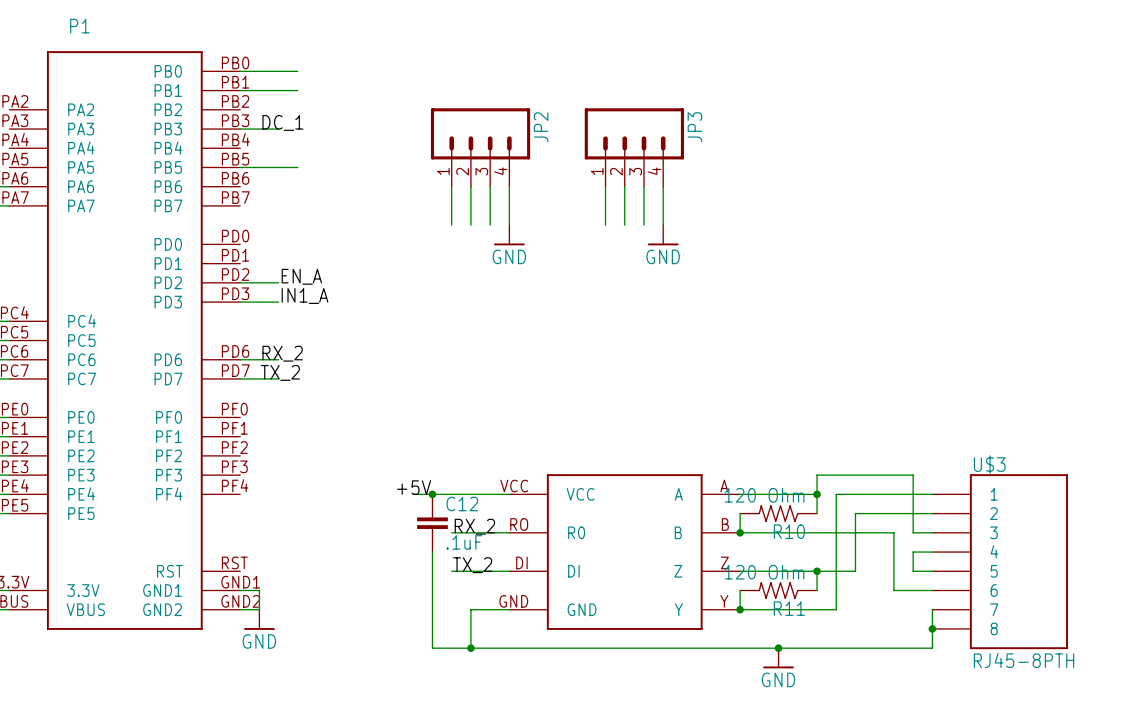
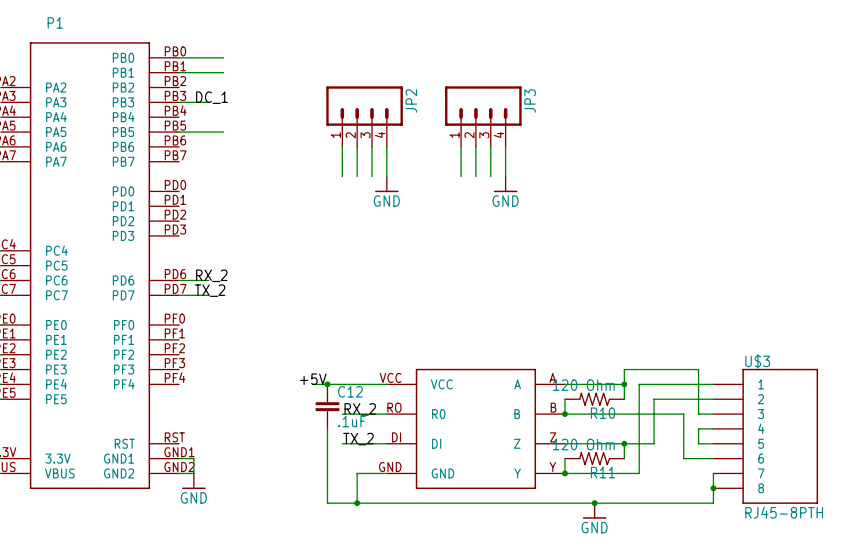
label: EN_A (301, 276) -> none
wire: (240, 282) (278, 282) -> none
label: IN1_A (305, 295) -> none
wire: (240, 302) (278, 302) -> none

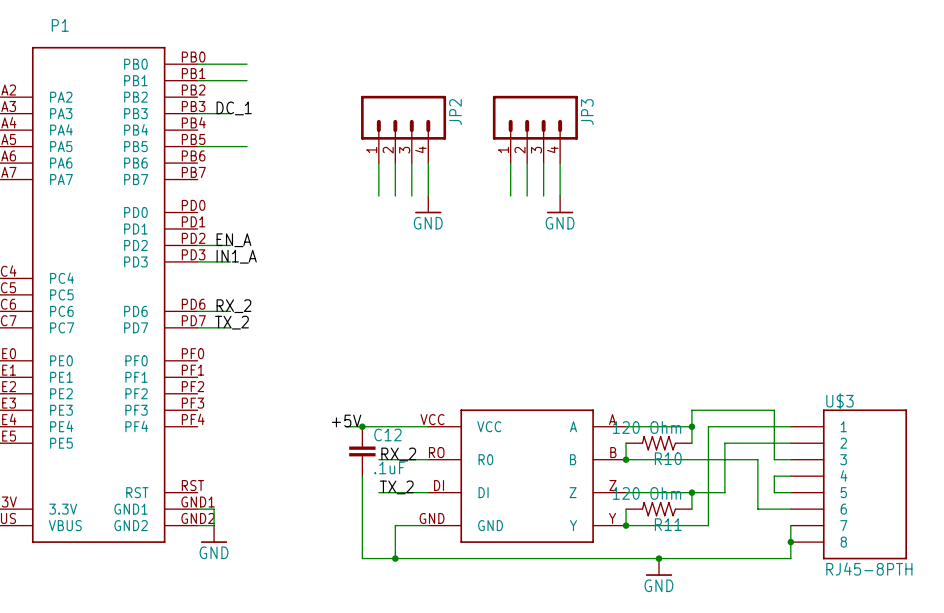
label: none -> EN_A (233, 240)
wire: none -> (197, 245) (230, 245)
label: none -> IN1_A (236, 256)
wire: none -> (197, 261) (230, 261)

